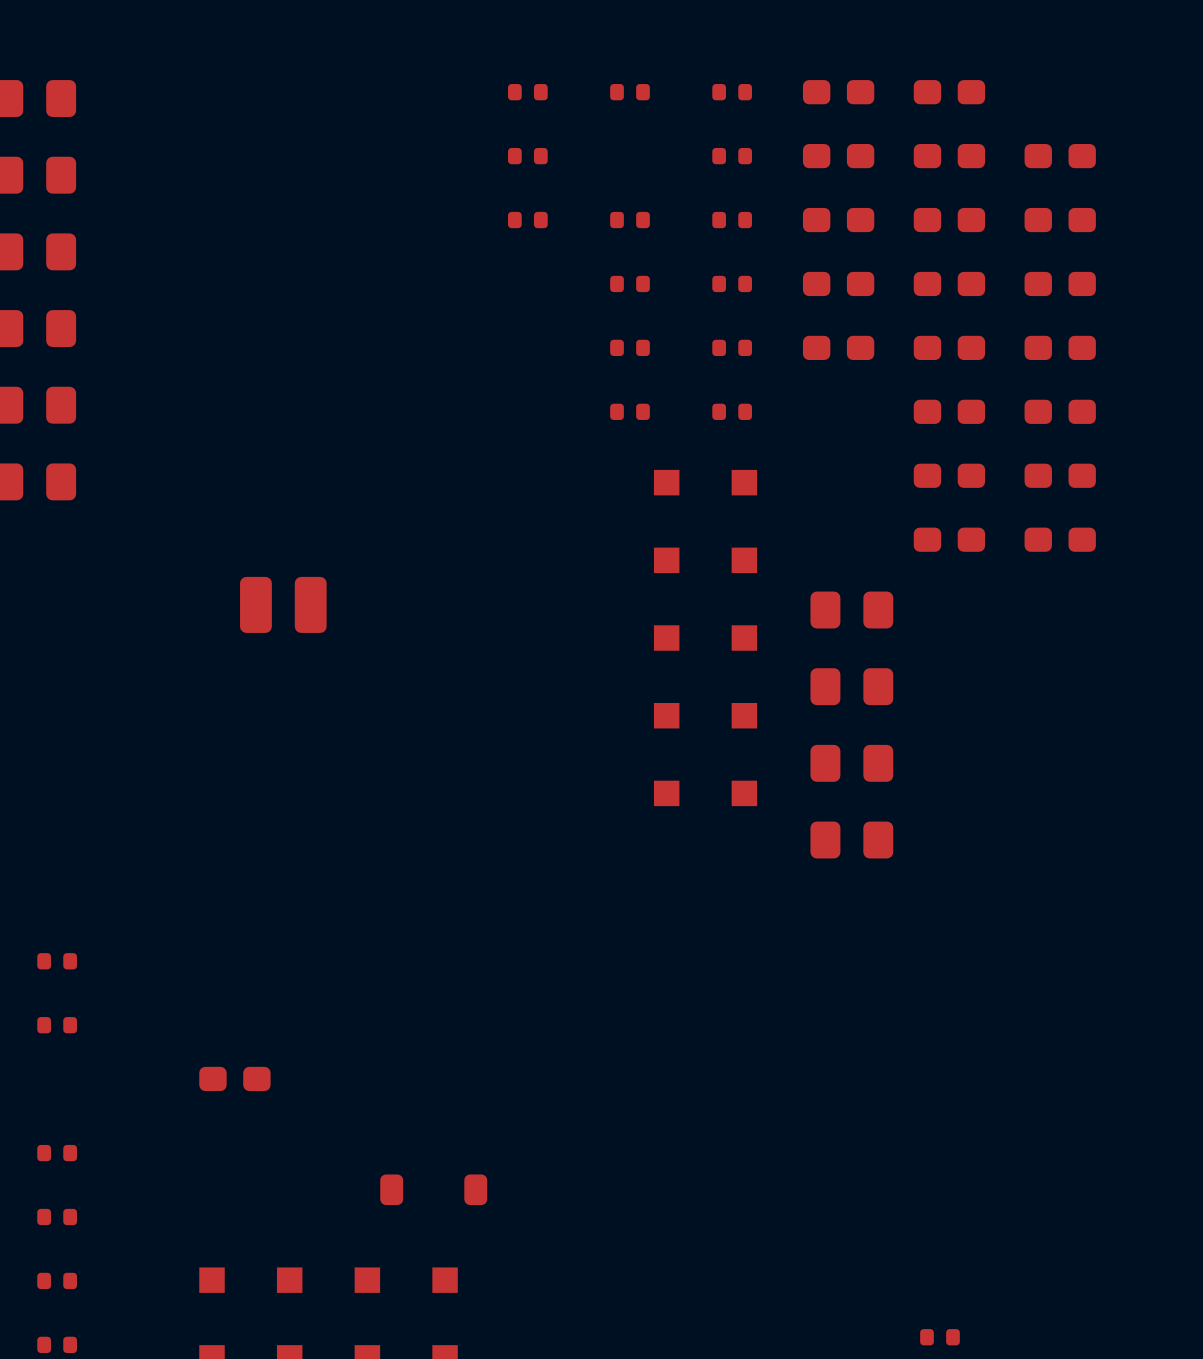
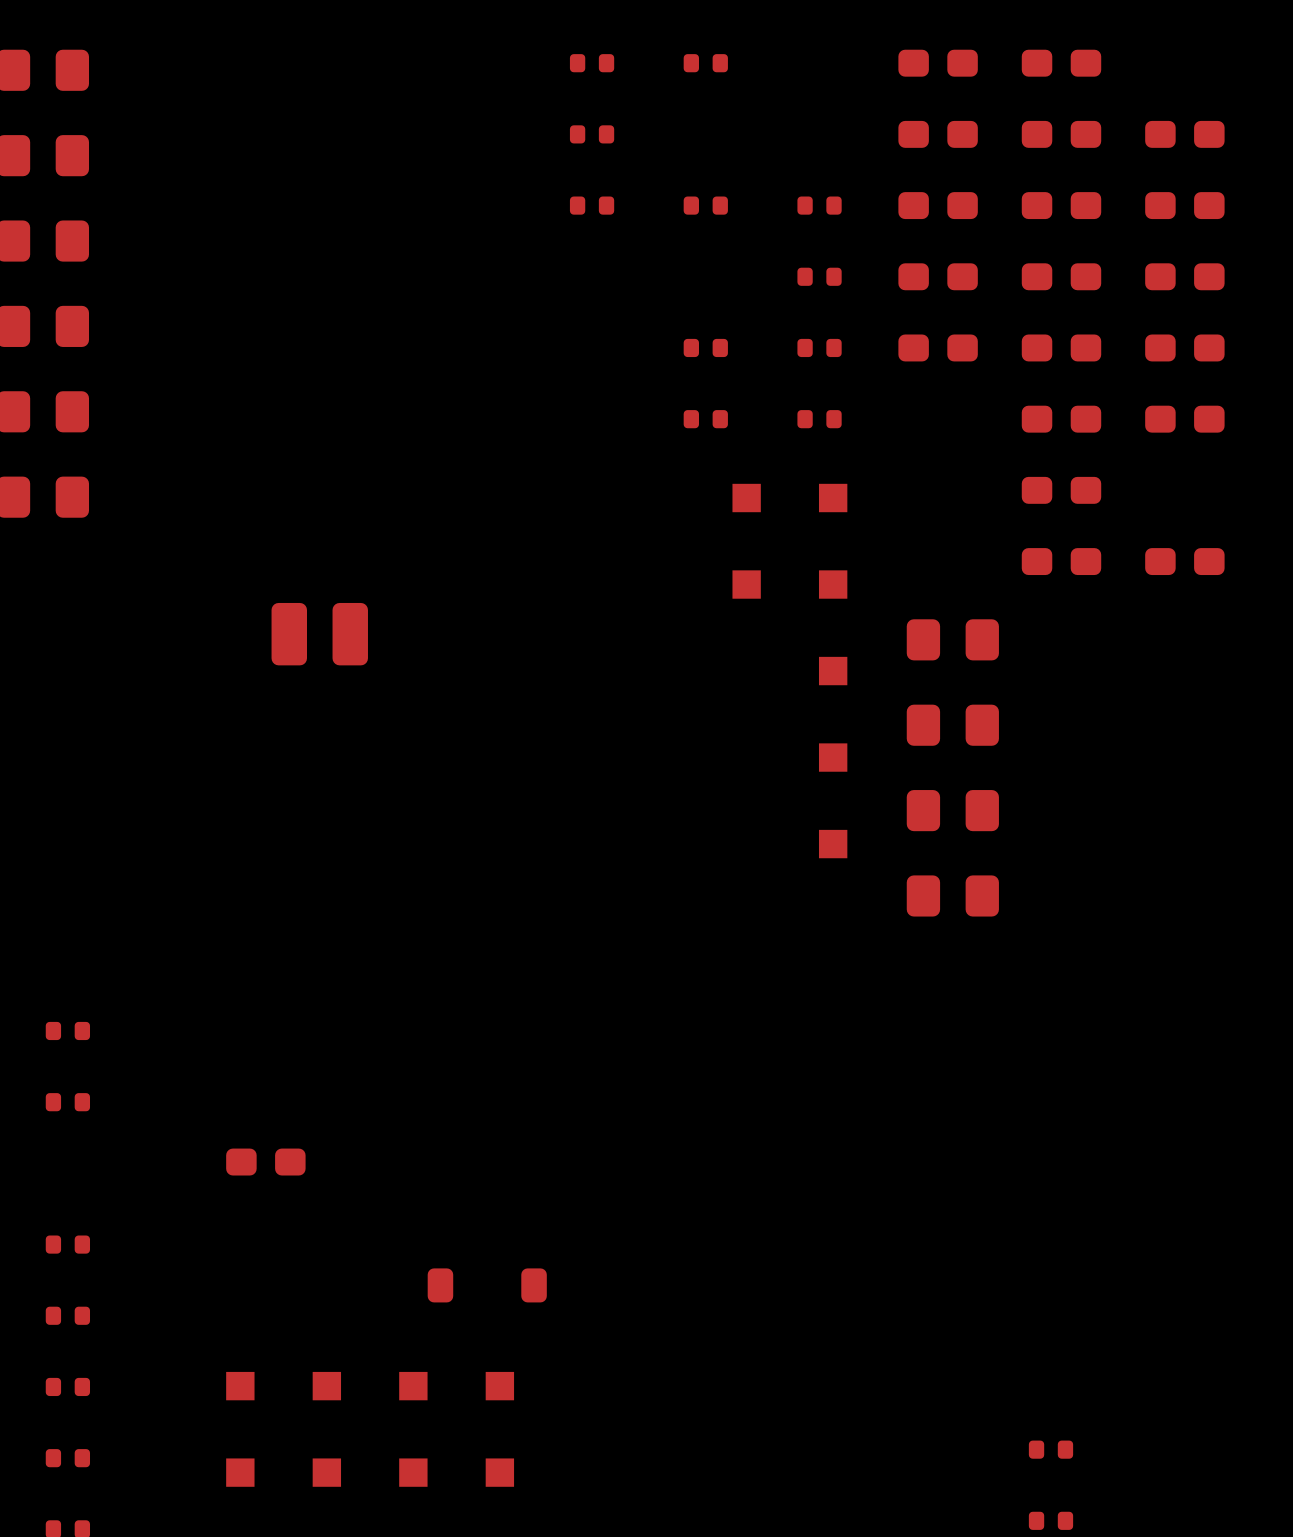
part: (732, 92) -> none
part: (732, 156) -> none
part: (630, 283) -> none
part: (1060, 475) -> none
part: (666, 638) -> none
part: (666, 715) -> none
part: (666, 793) -> none

